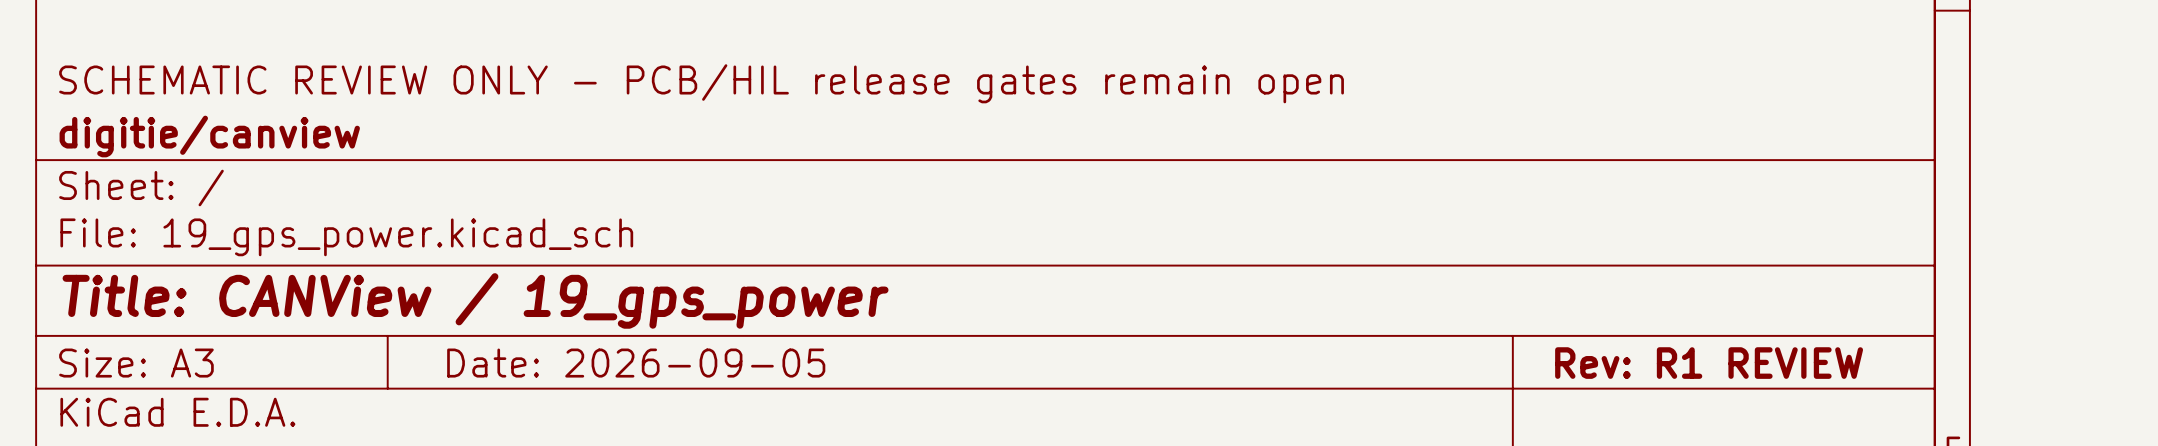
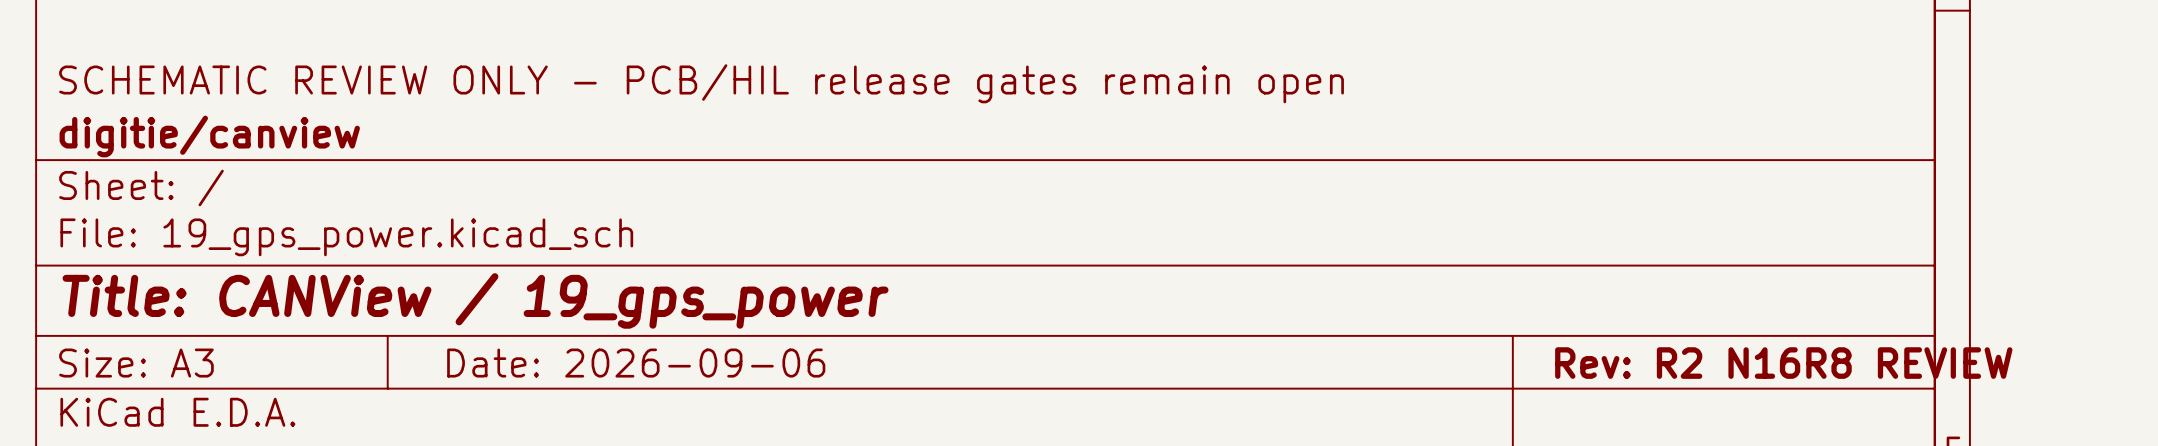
title block: Date: 2026-09-05 (636, 363) -> Date: 2026-09-06 (636, 363)
title block: Rev: R1 REVIEW (1709, 363) -> Rev: R2 N16R8 REVIEW (1783, 363)

